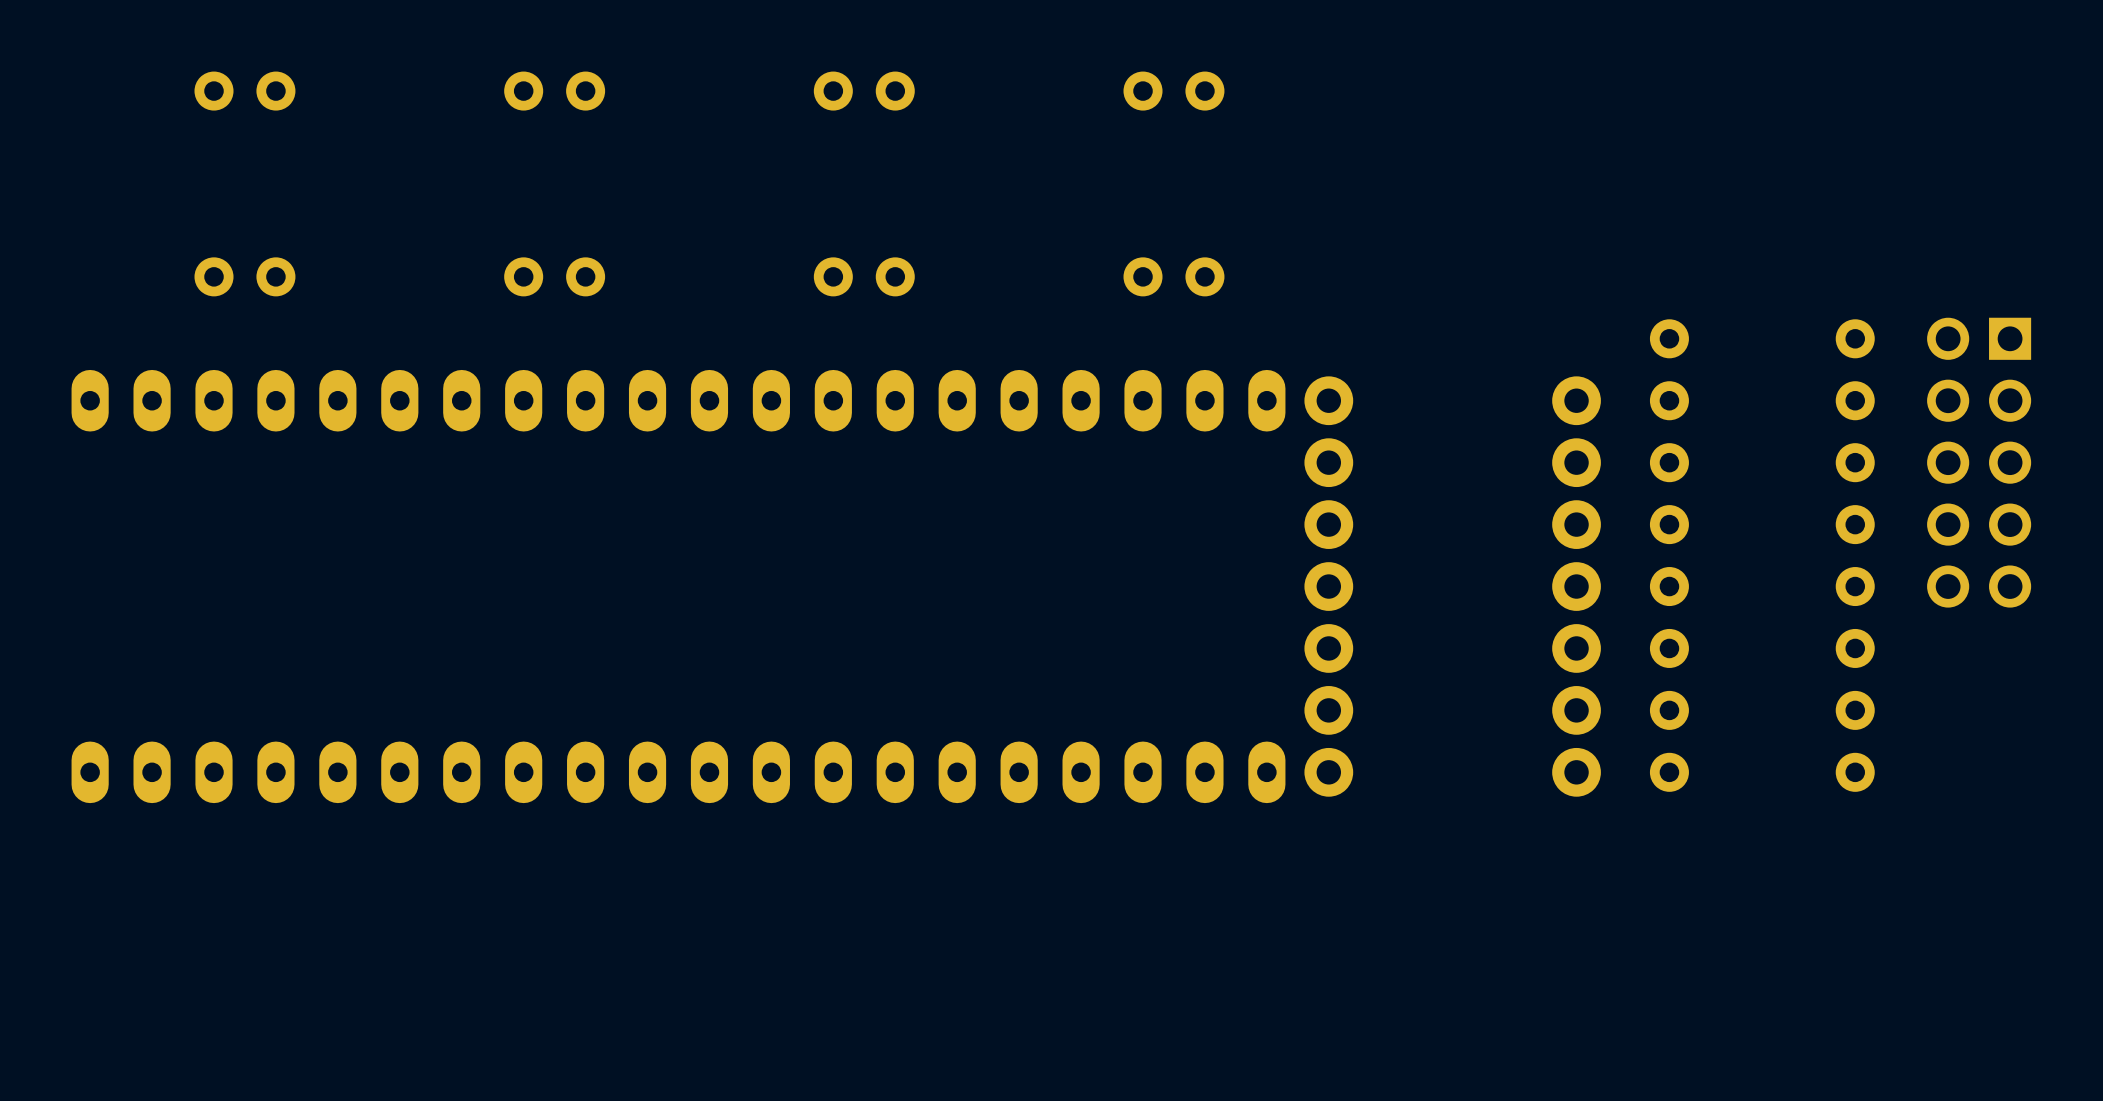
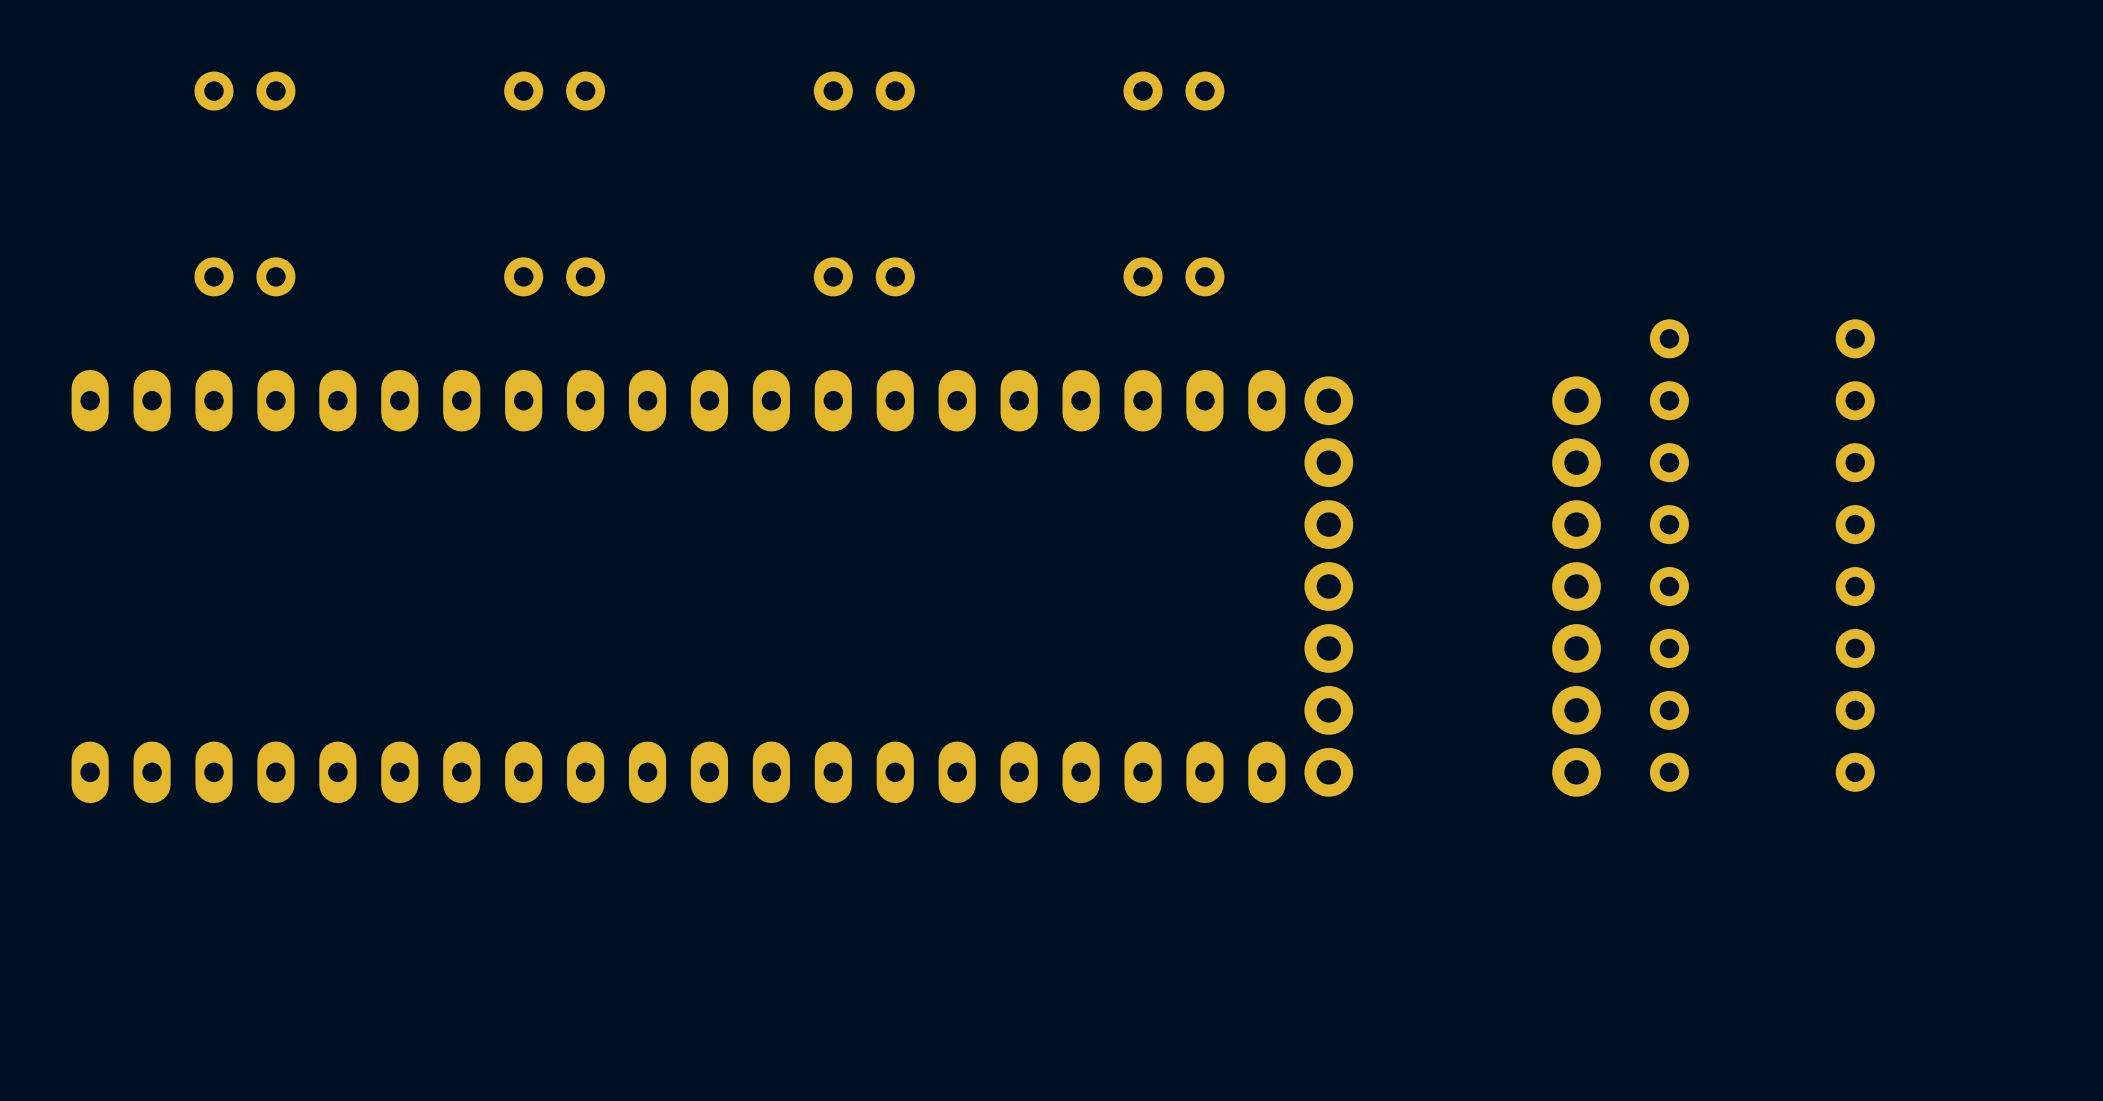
part: (1979, 462) -> none

